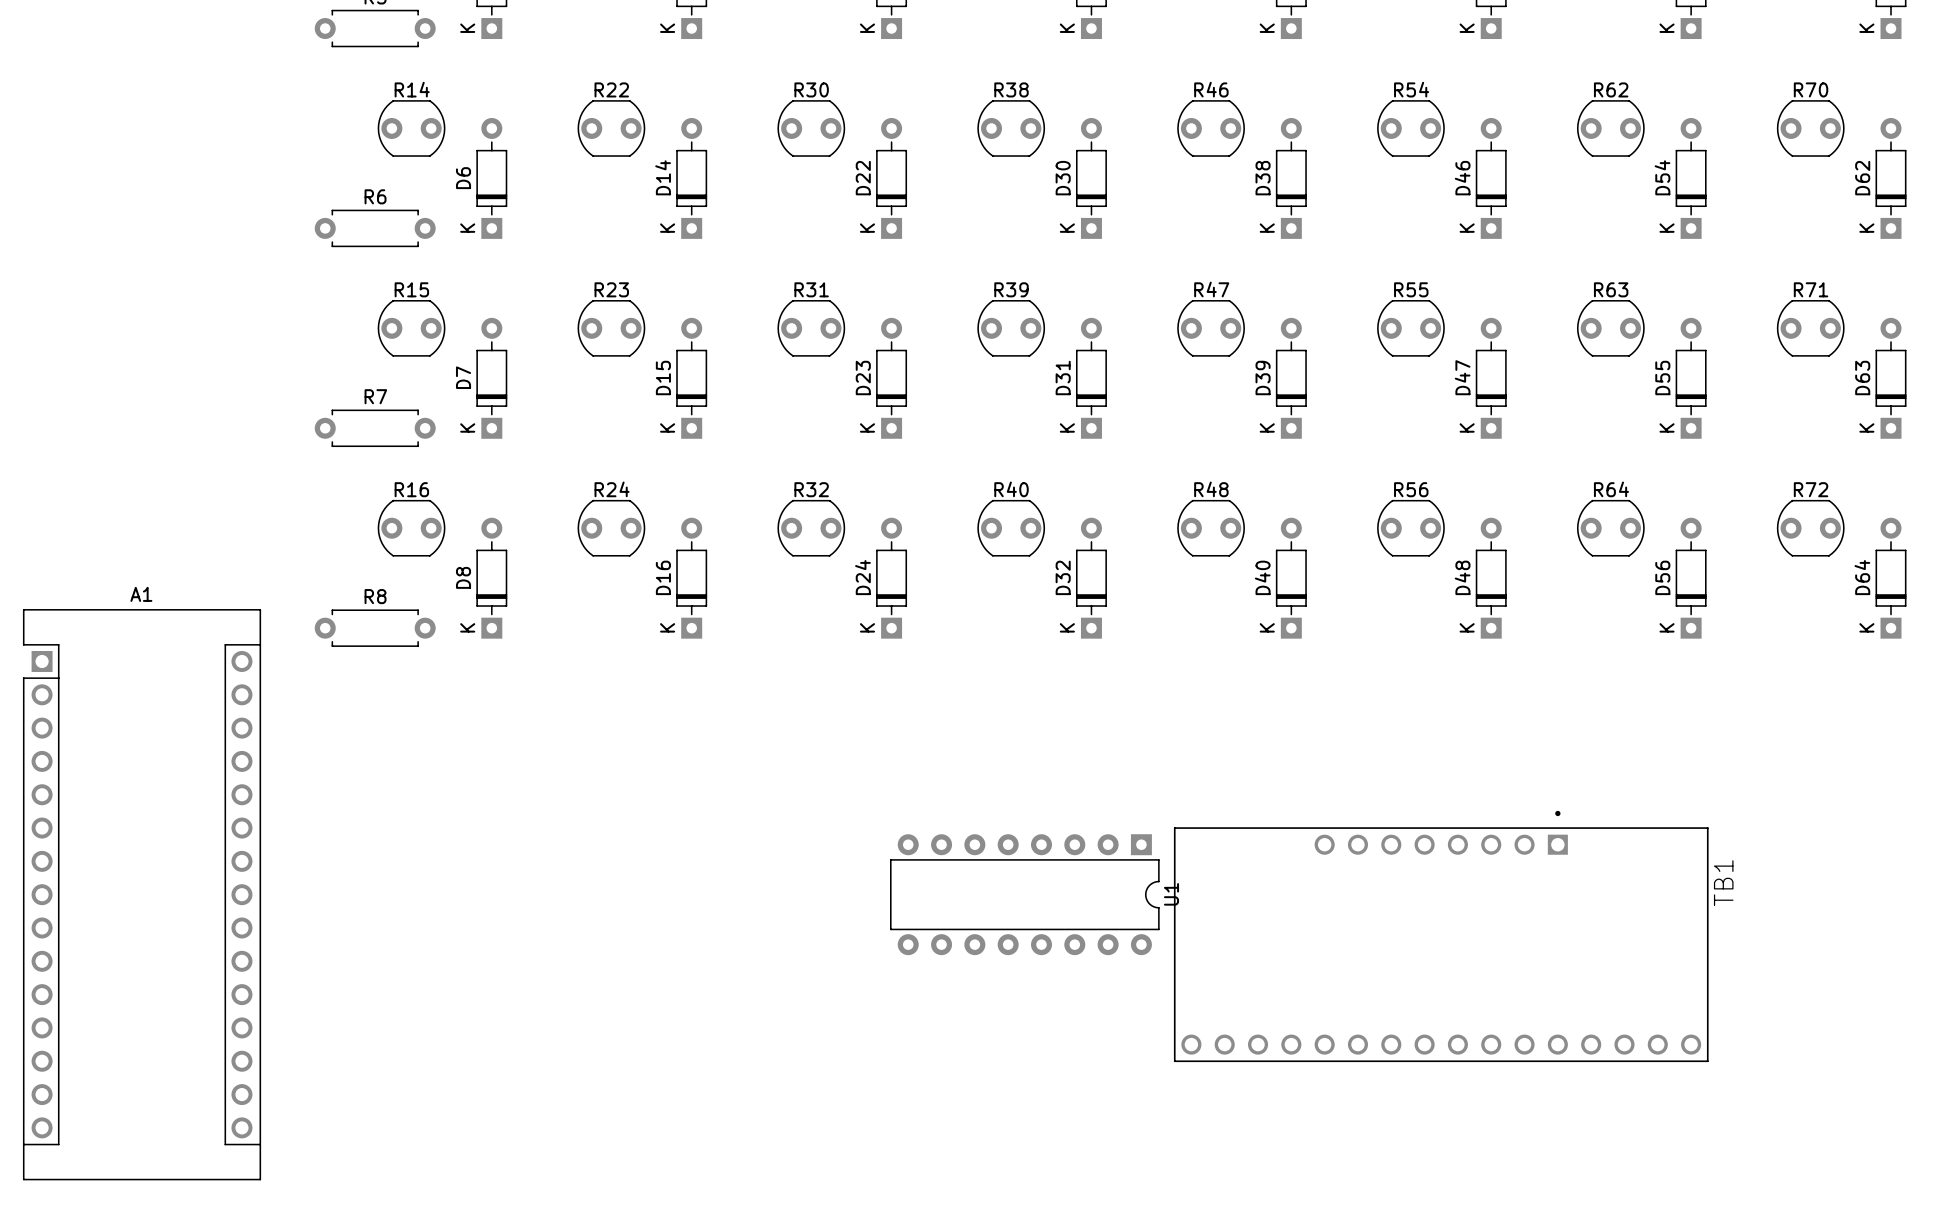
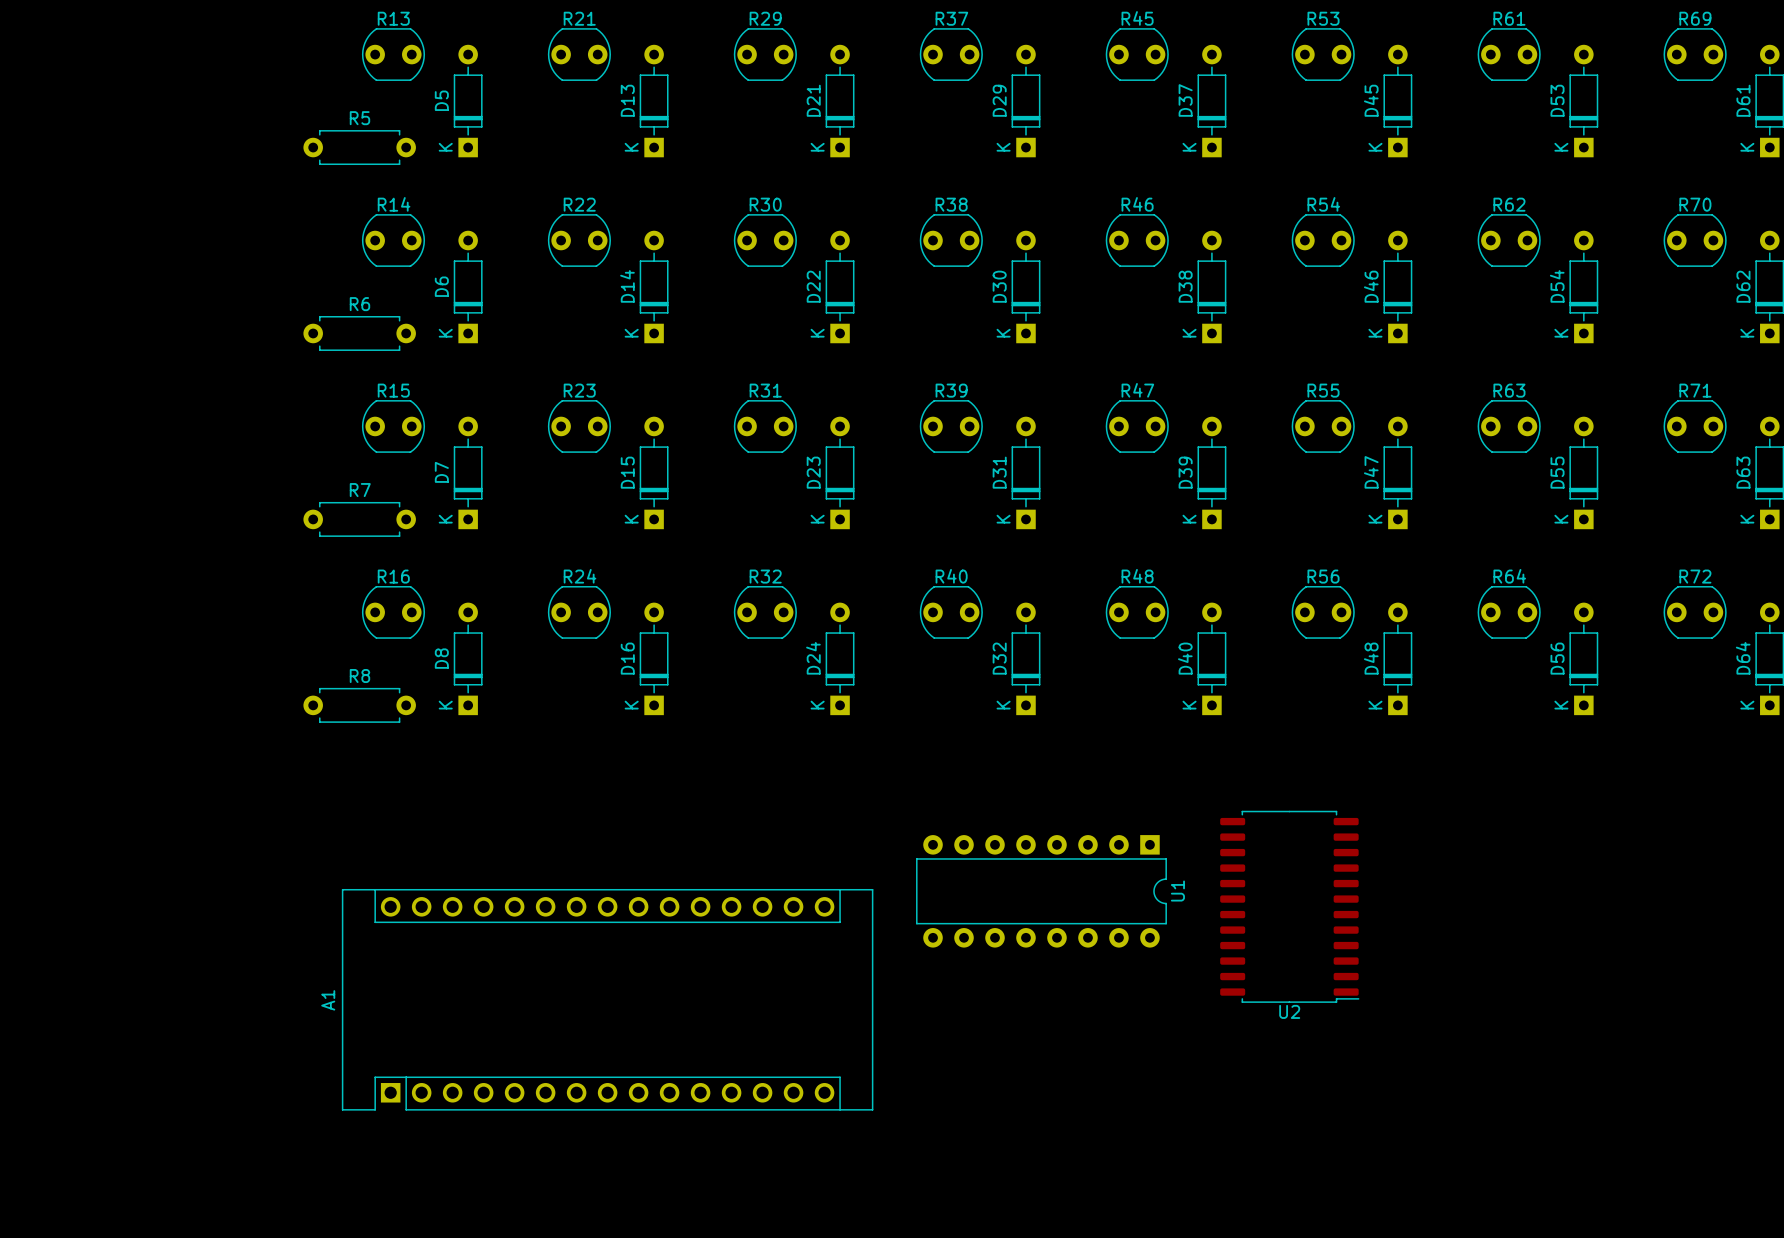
U2: none -> (1289, 906)
A1 rotation: 0° (142, 894) -> 90° counterclockwise (607, 999)
A1 position: (142, 894) -> (607, 999)
U1 position: (1024, 894) -> (1041, 891)
TB1: (1441, 936) -> none

